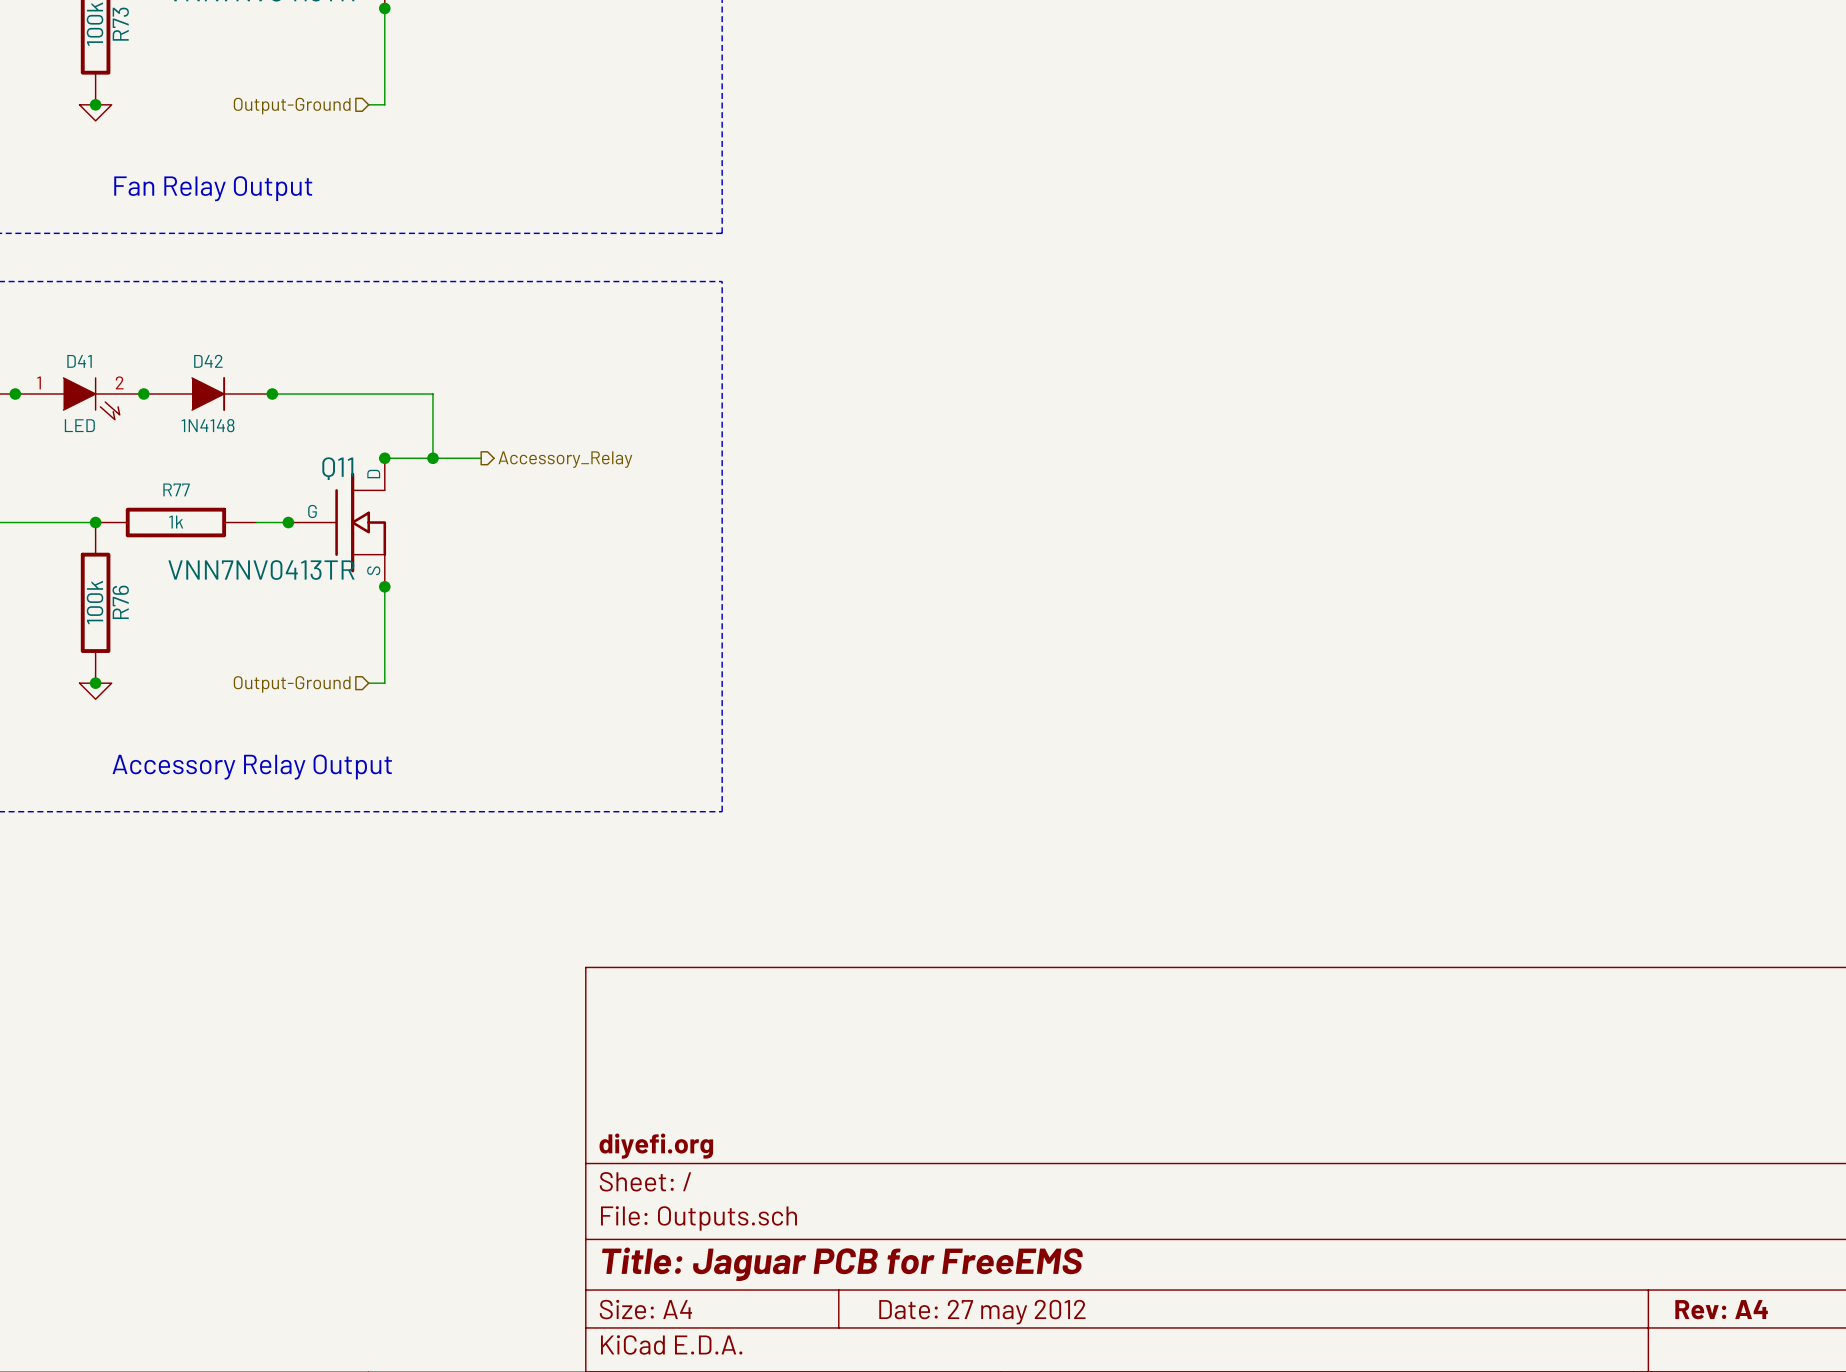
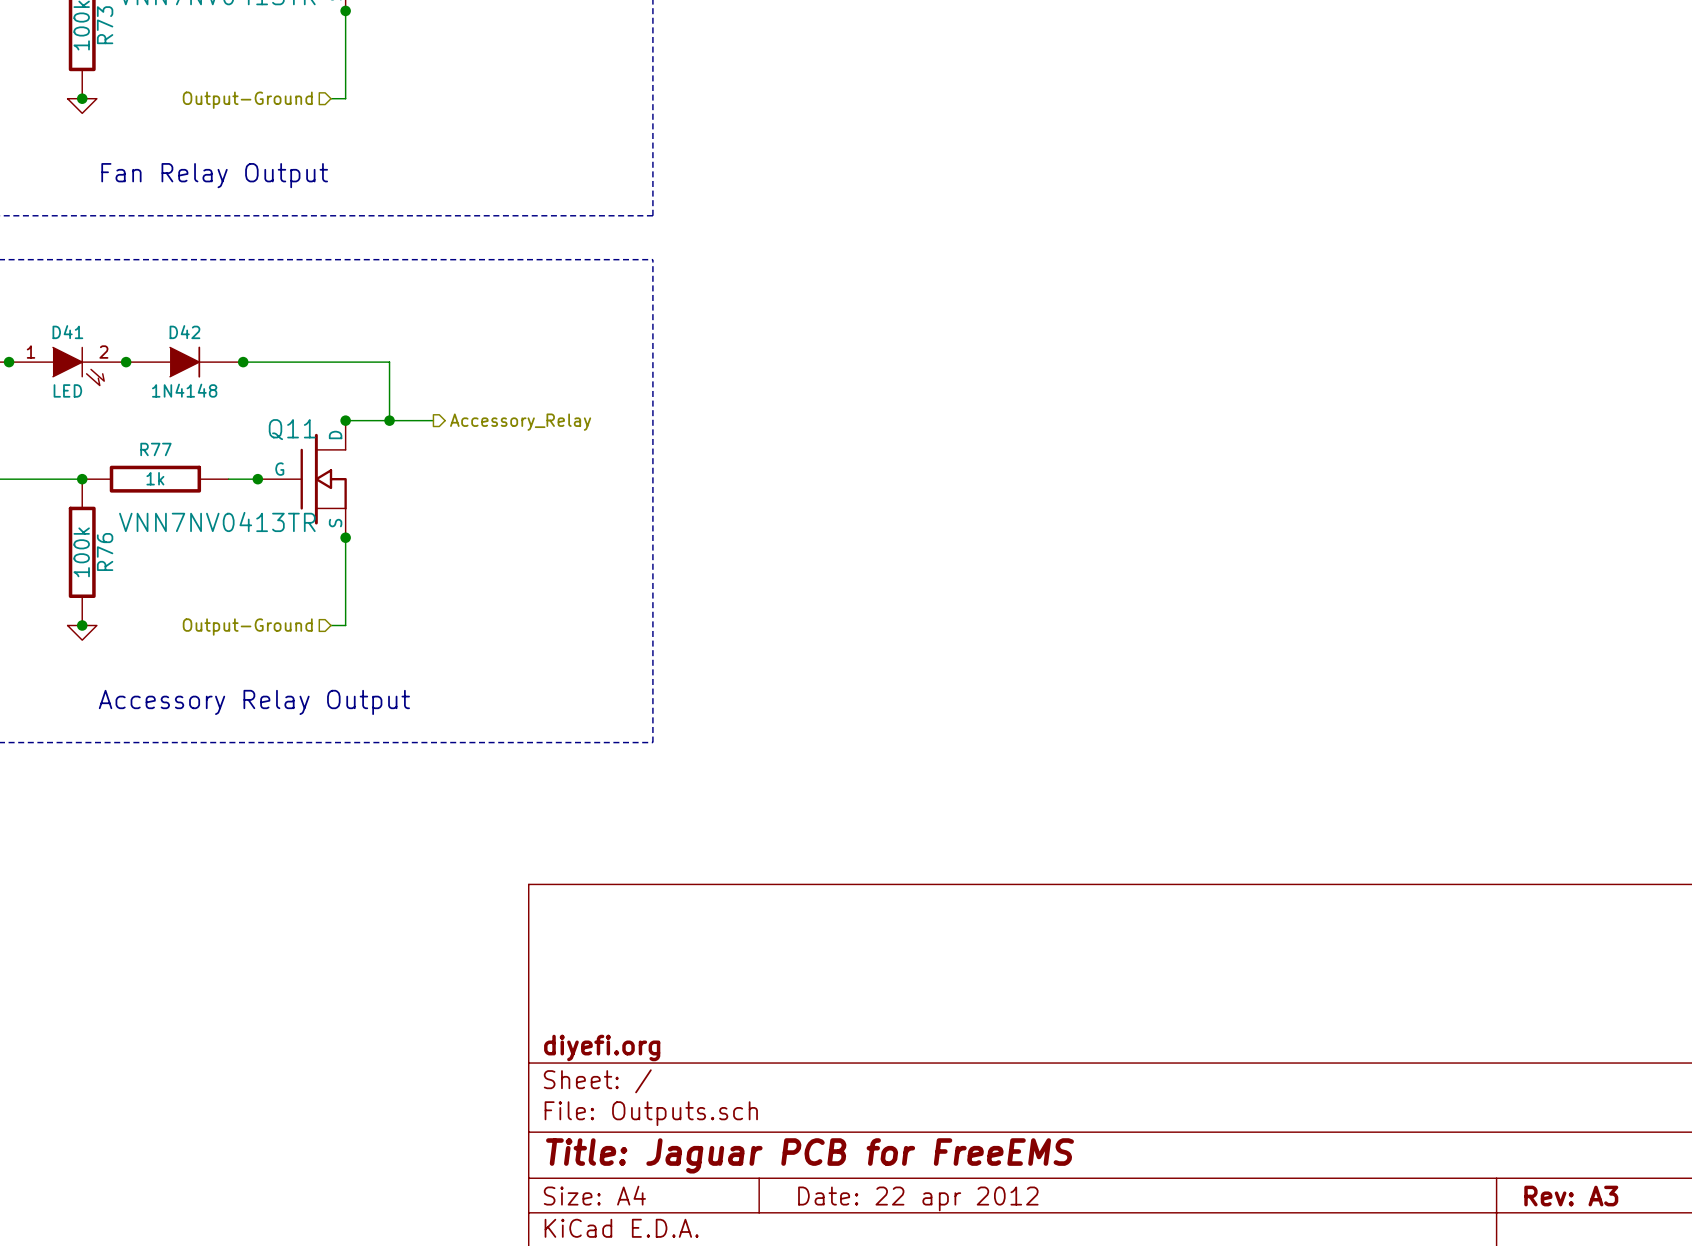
title block: Rev: A4 (1721, 1309) -> Rev: A3 (1571, 1196)
title block: Date: 27 may 2012 (982, 1312) -> Date: 22 apr 2012 (918, 1198)

